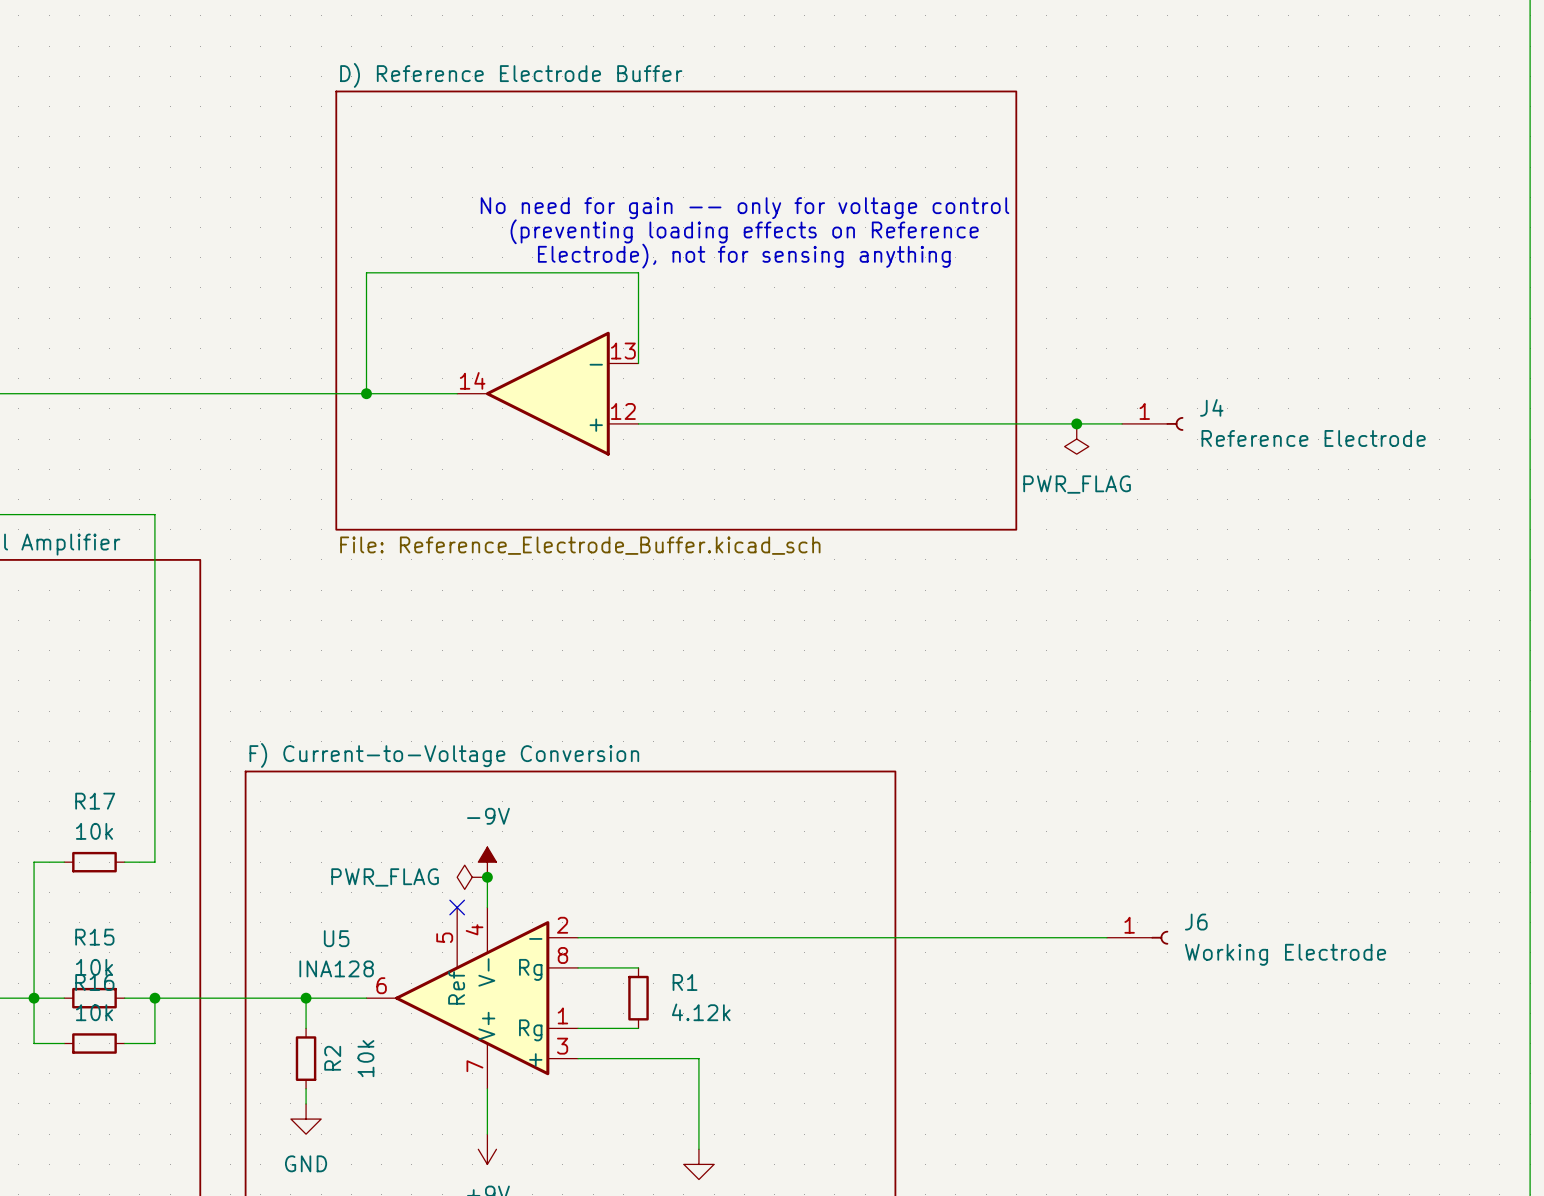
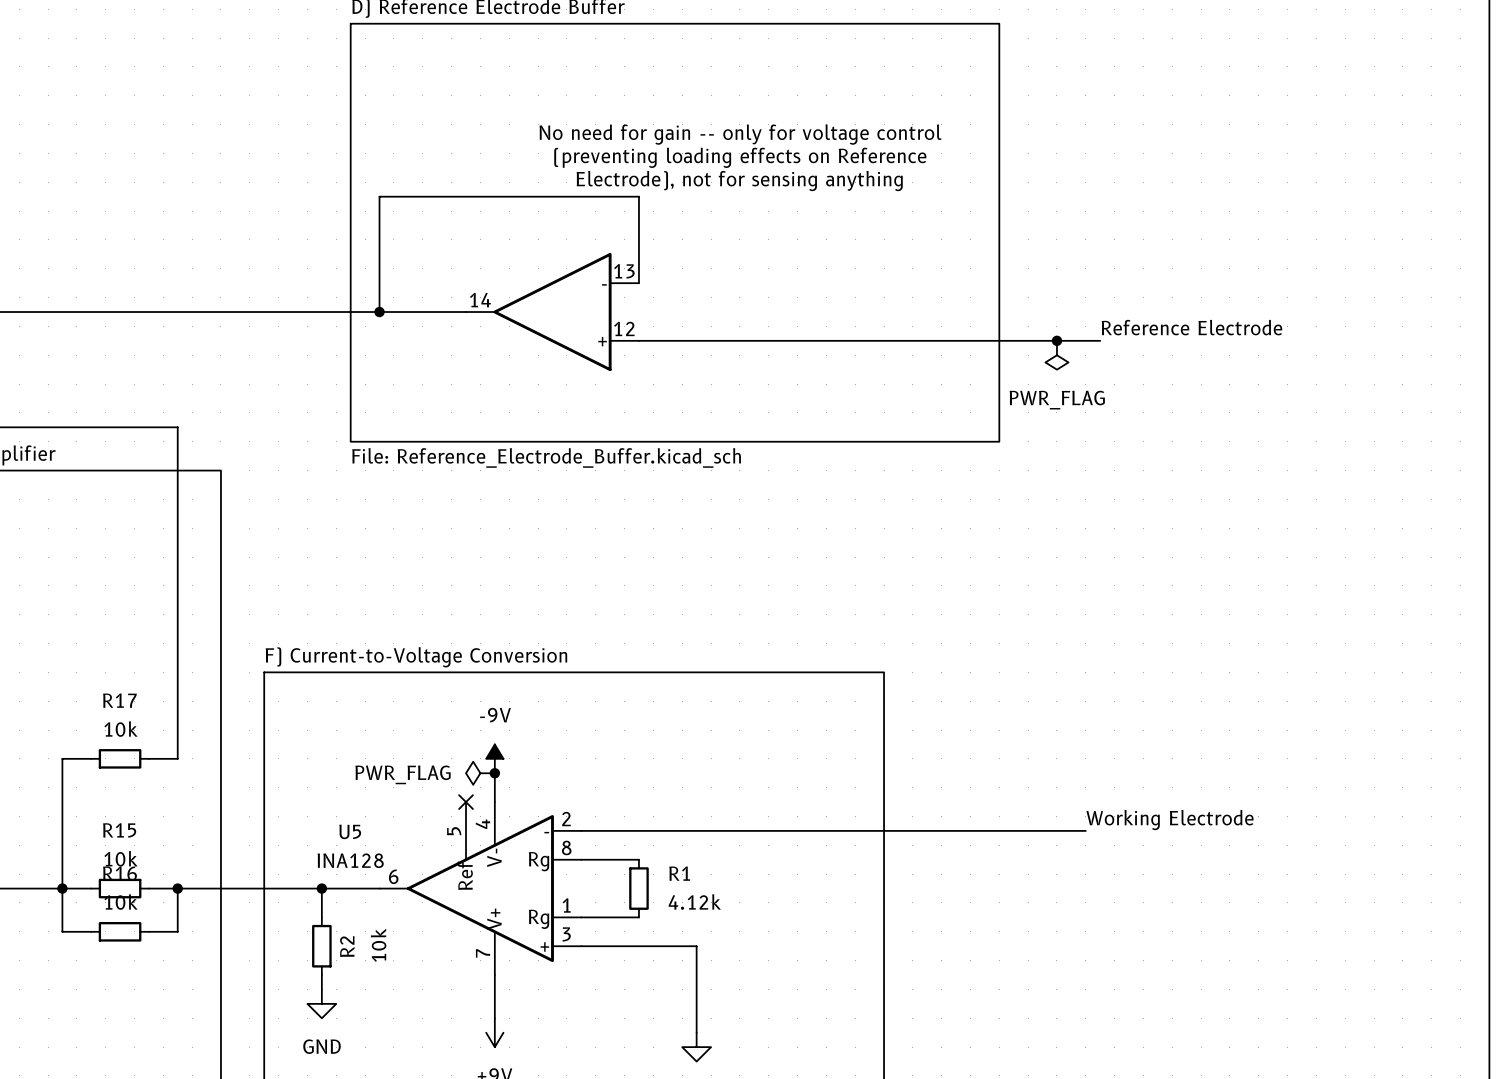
label: none -> Reference Electrode (1191, 327)
J4: Reference Electrode (1152, 423) -> none
label: none -> Working Electrode (1170, 820)
J6: Working Electrode (1137, 937) -> none

